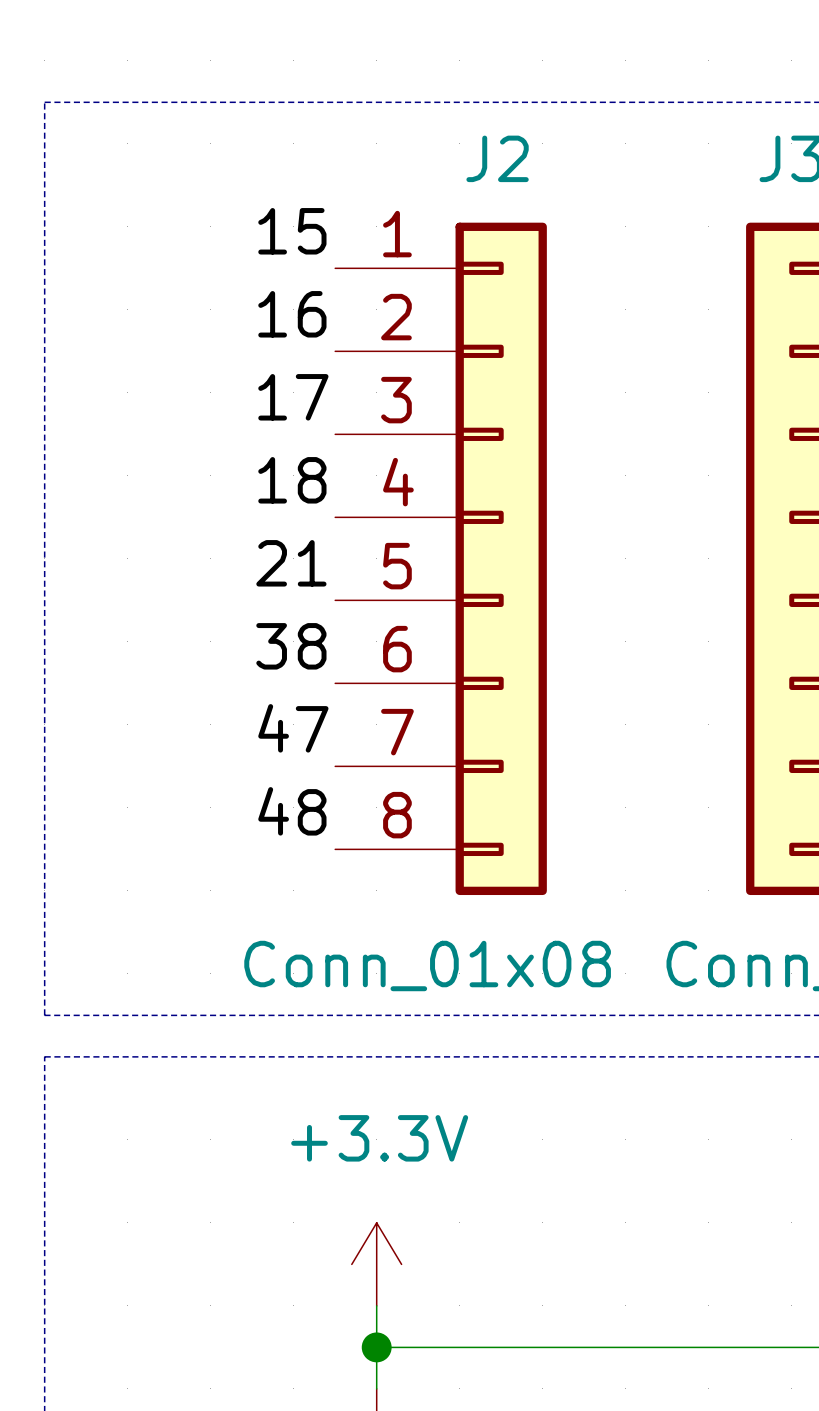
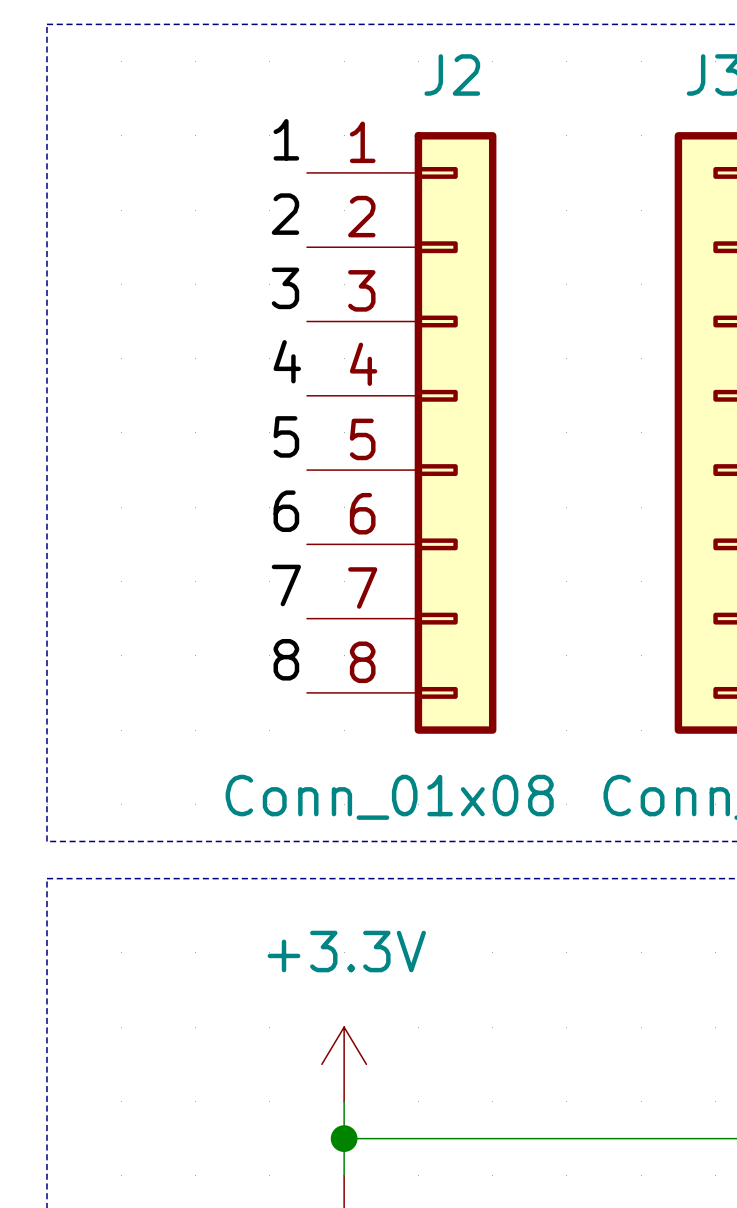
label: 15 (292, 231) -> 1 (286, 139)
label: 16 (292, 314) -> 2 (285, 214)
label: 17 (293, 397) -> 3 (285, 288)
label: 18 (292, 480) -> 4 (287, 361)
label: 21 (291, 563) -> 5 (286, 436)
label: 38 (291, 646) -> 6 (286, 511)
label: 47 (293, 728) -> 7 (286, 585)
label: 48 (292, 811) -> 8 (286, 659)

